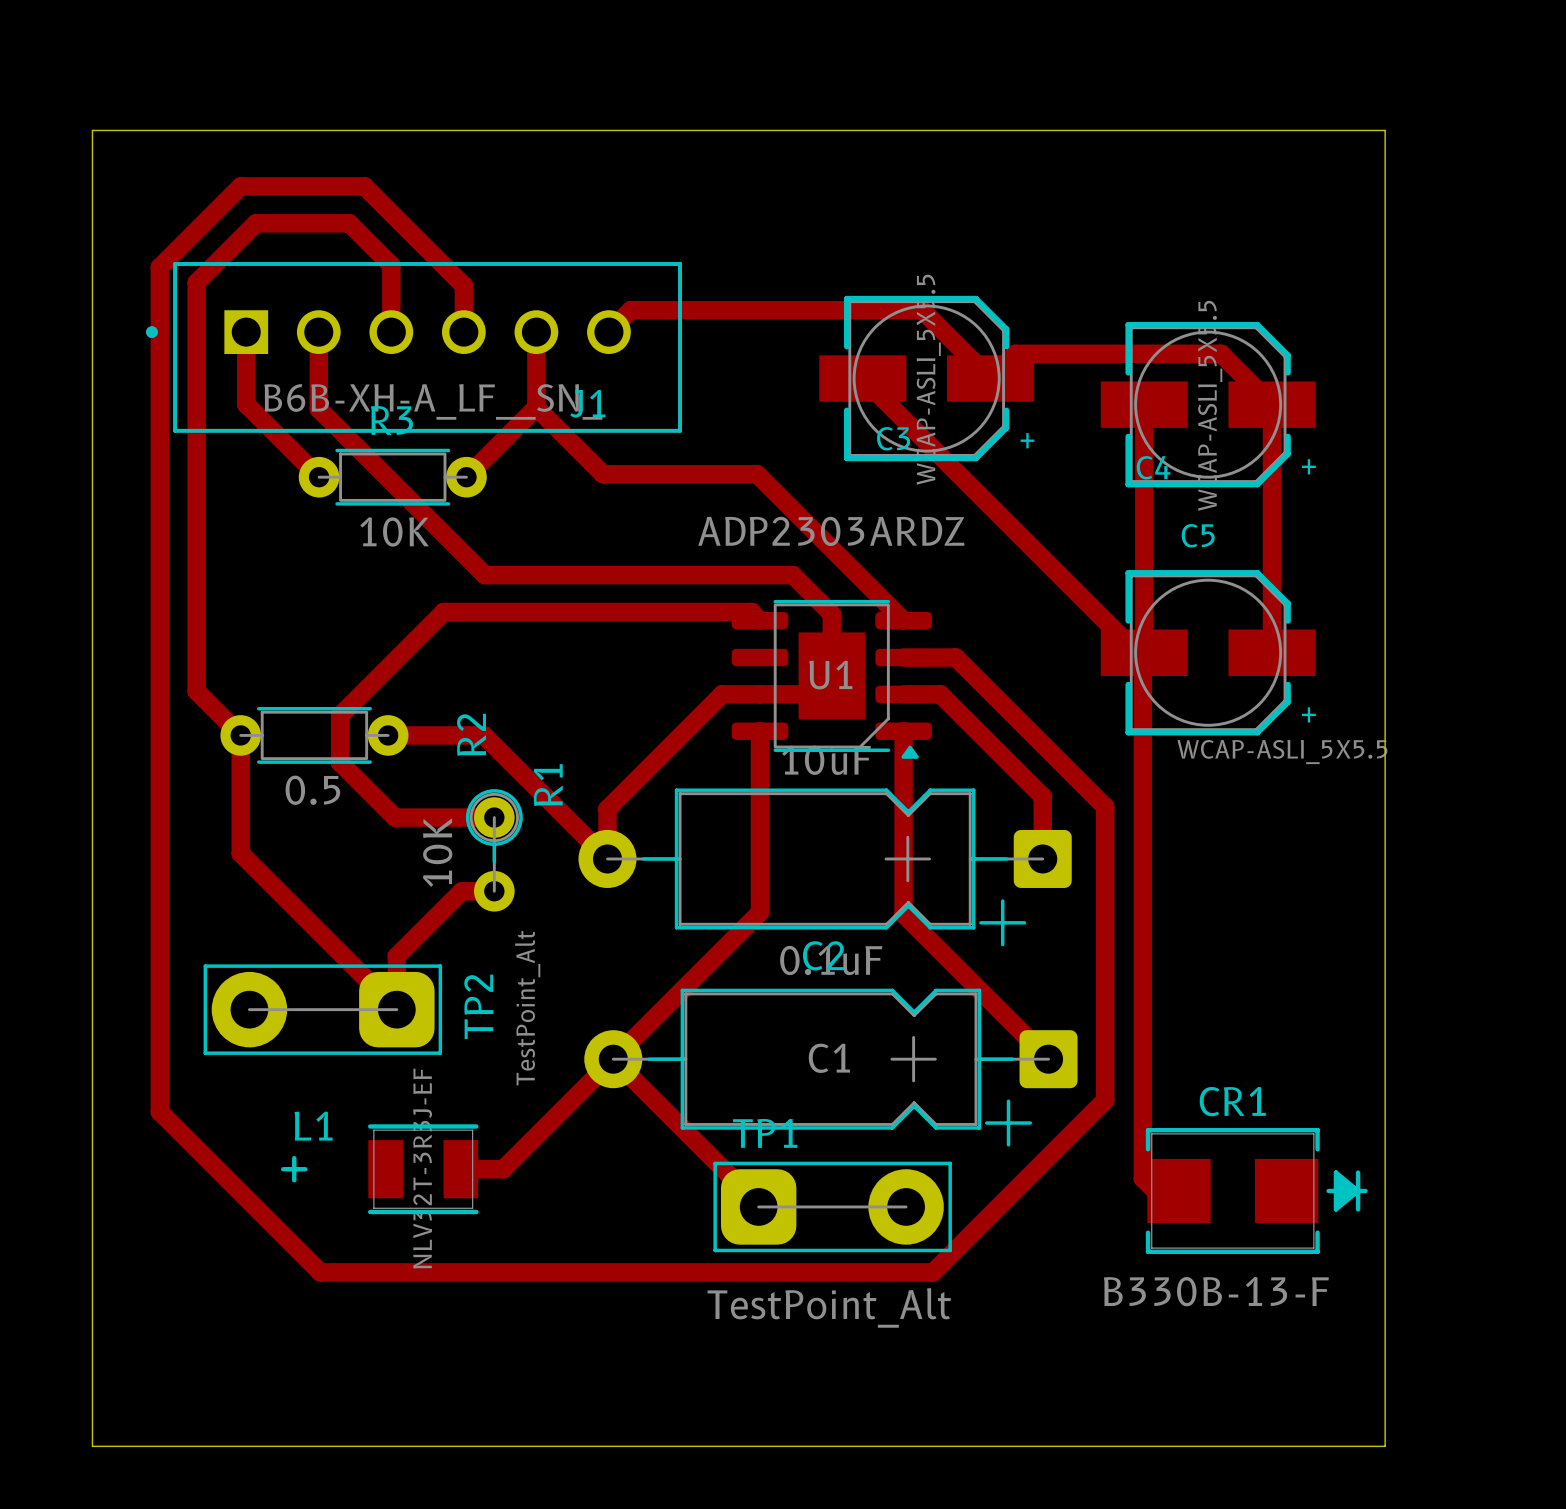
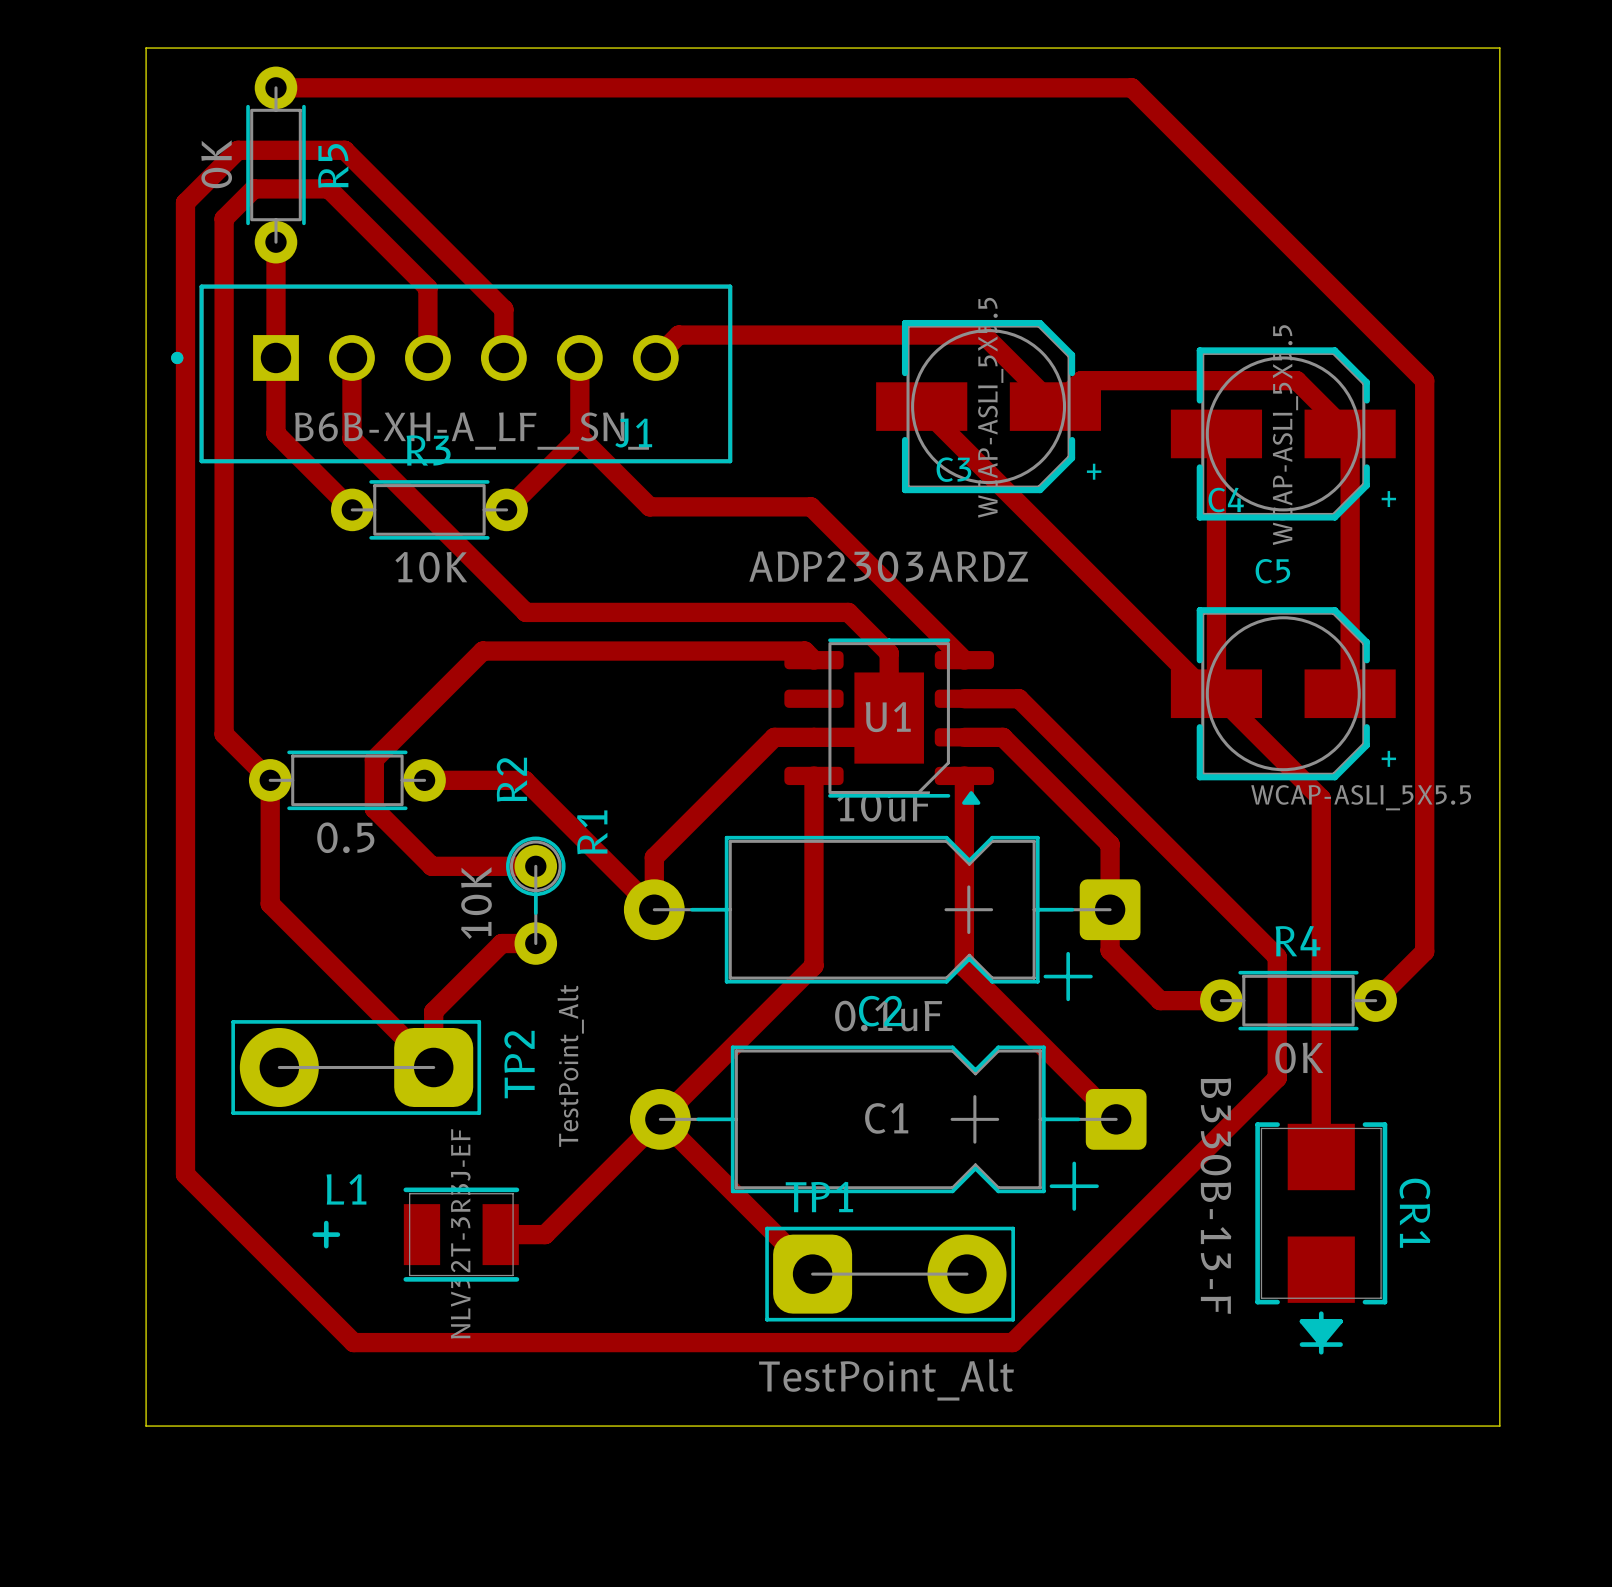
top track: none -> (275, 87) (1131, 87) (1424, 380) (1424, 951) (1375, 1000)
board edge: (92, 130) (1385, 130) (1385, 1446) (92, 1446) (92, 130) -> (146, 48) (146, 1426) (1499, 1426) (1499, 48) (146, 48)
R5: none -> 0K (275, 165)
top track: (364, 186) (240, 186) (159, 267) -> (399, 205) (344, 150) (237, 150) (185, 202) (185, 290)
top track: none -> (275, 242) (275, 357) (274, 356)
top track: (349, 223) (255, 223) (196, 282) -> (383, 244) (328, 188) (253, 188) (224, 218) (224, 306)
top track: none -> (1216, 693) (1321, 798) (1321, 1157)
top track: (1142, 654) (1142, 1178) (1155, 1190) (1178, 1190) -> none
top track: (1105, 807) (1105, 1100) (933, 1272) -> (1175, 855) (1277, 956) (1277, 1078) (1012, 1342) (995, 1342)
top track: none -> (1110, 909) (1110, 950) (1160, 1000) (1221, 1000)
R4: none -> 0K (1298, 1000)
CR1 rotation: 0° (1256, 1190) -> 90° clockwise (1321, 1238)

